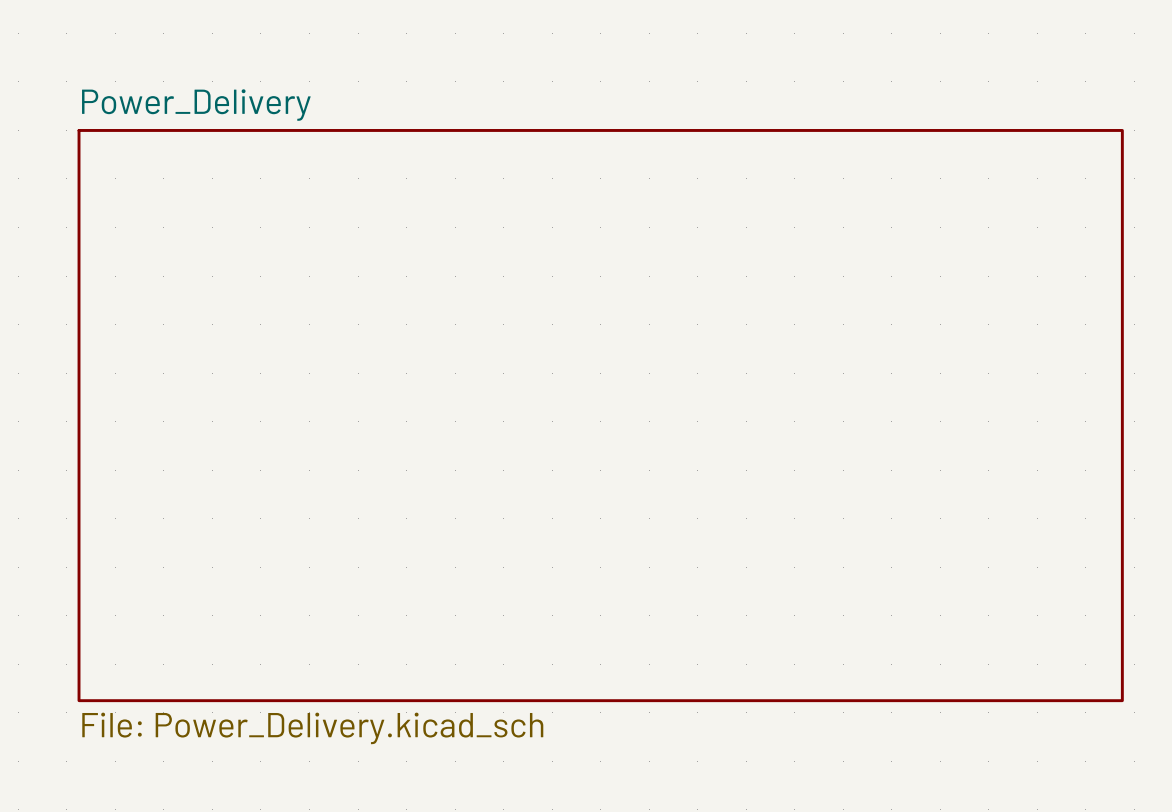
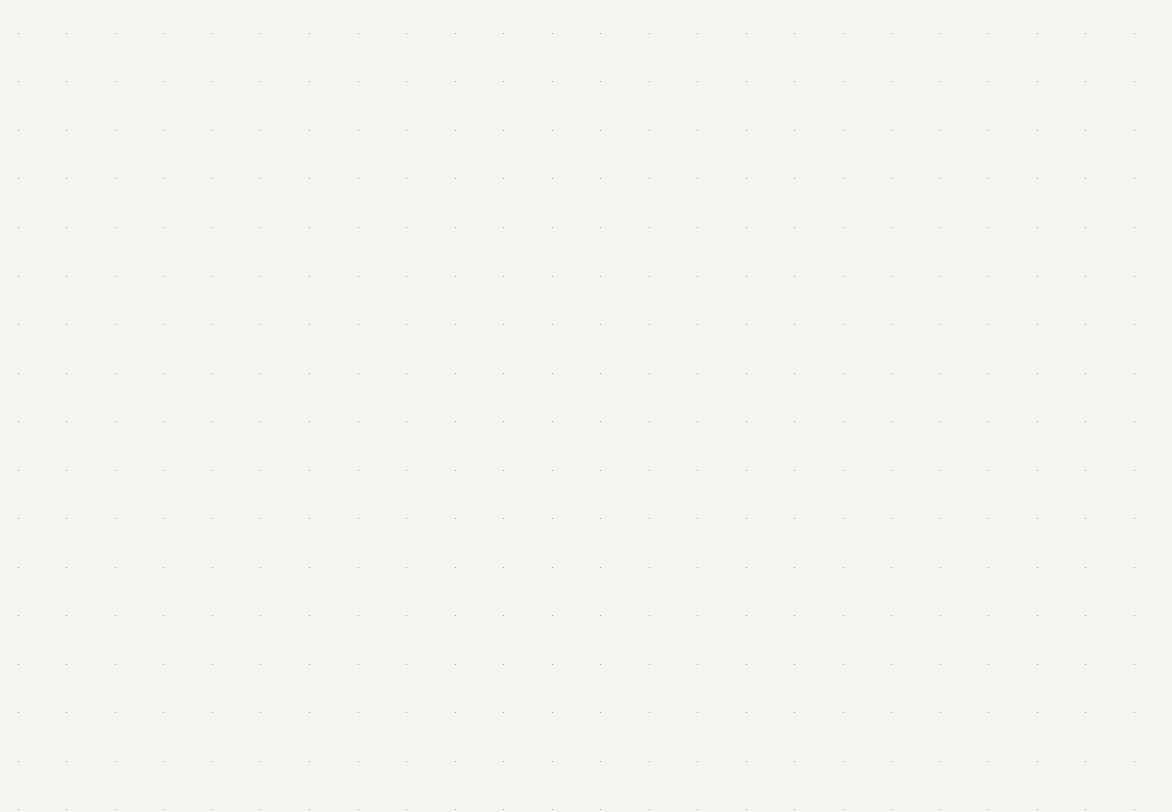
sheet Power_Delivery: File: Power_Delivery.kicad_sch (600, 415) -> none

